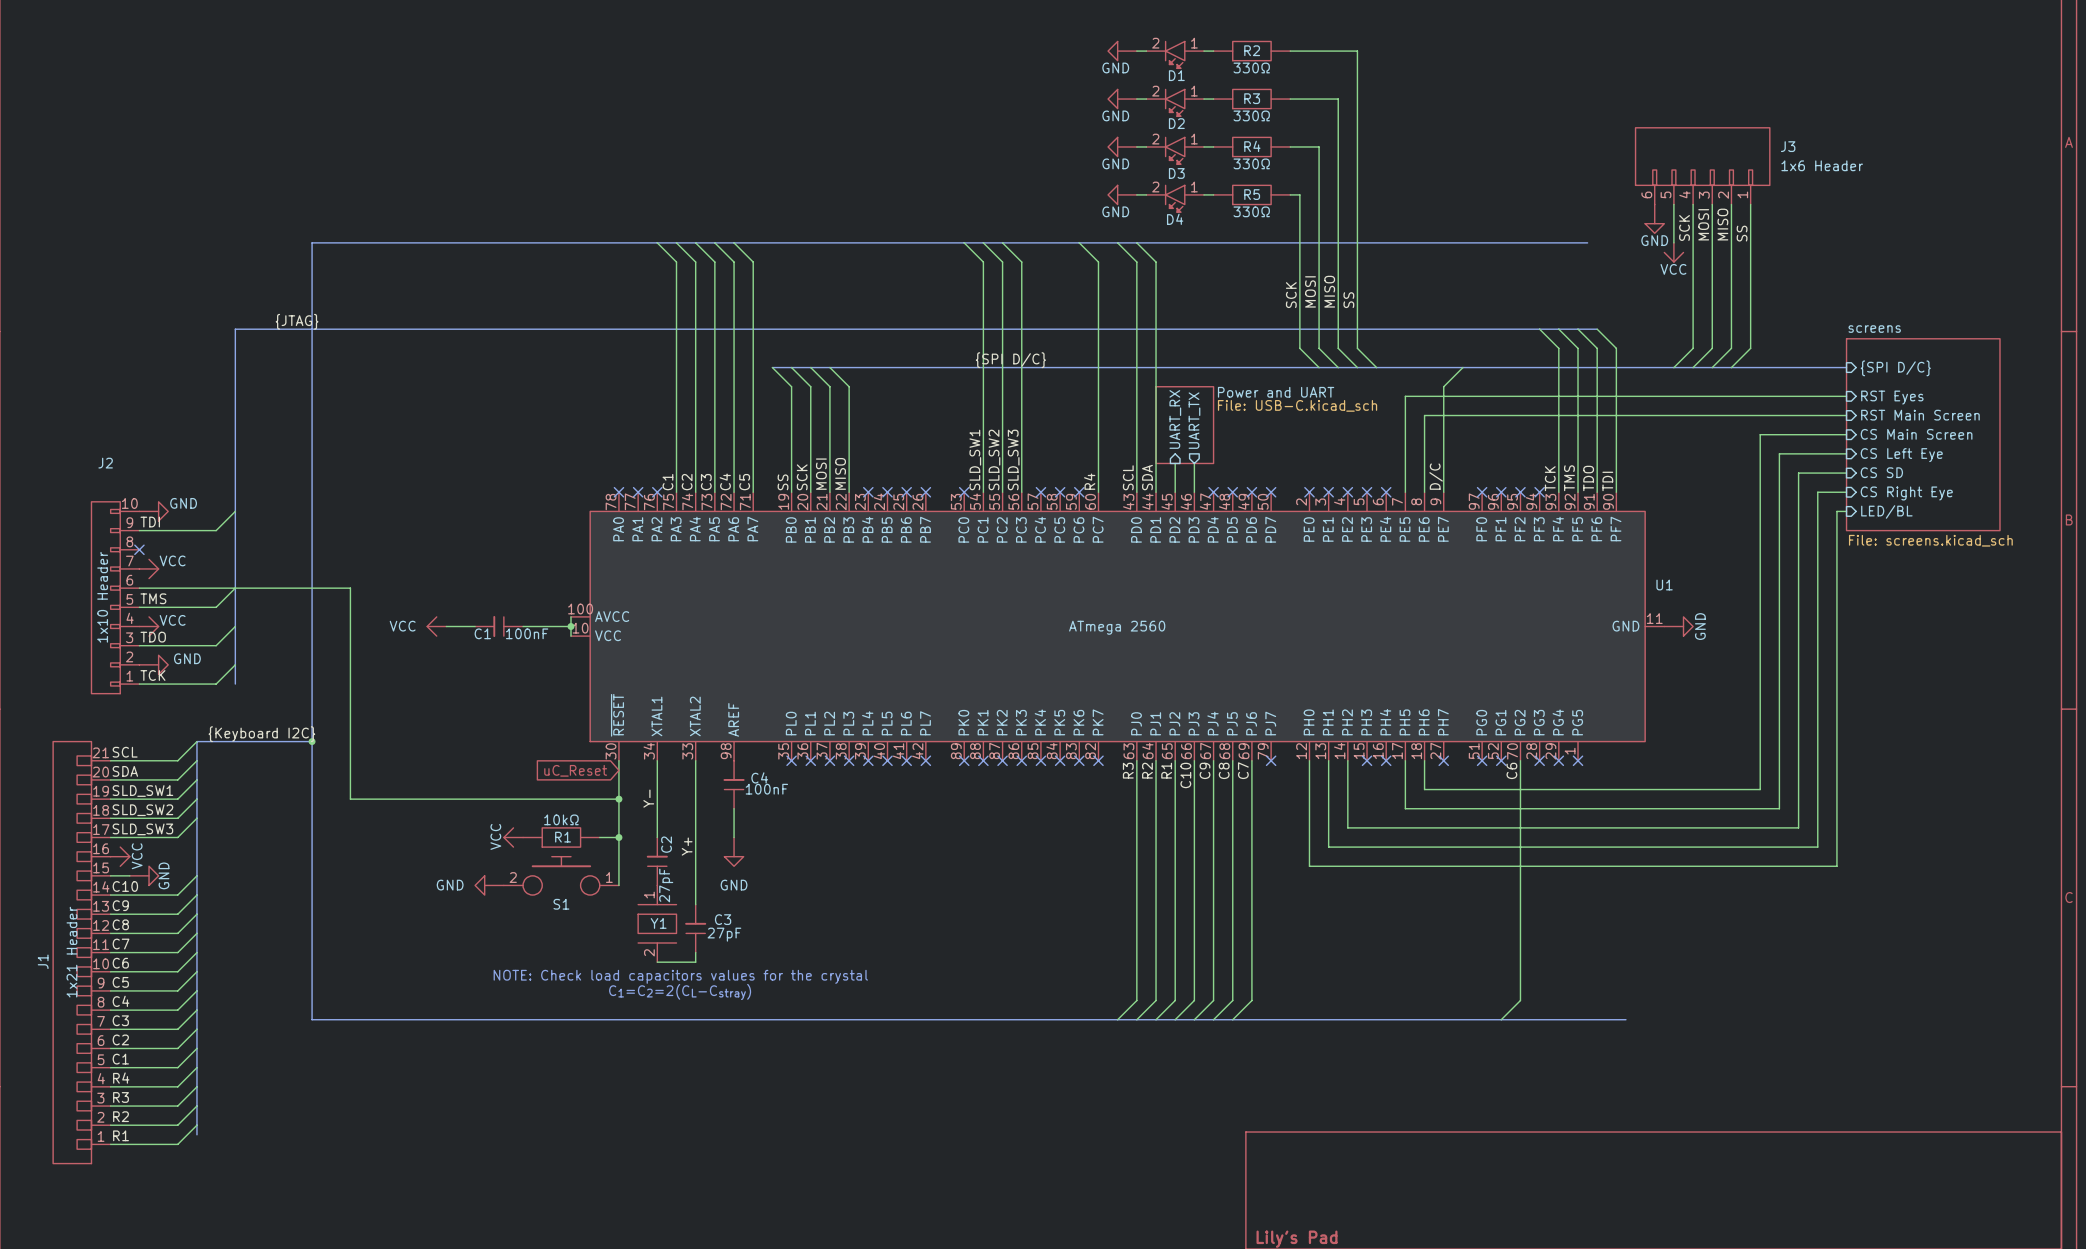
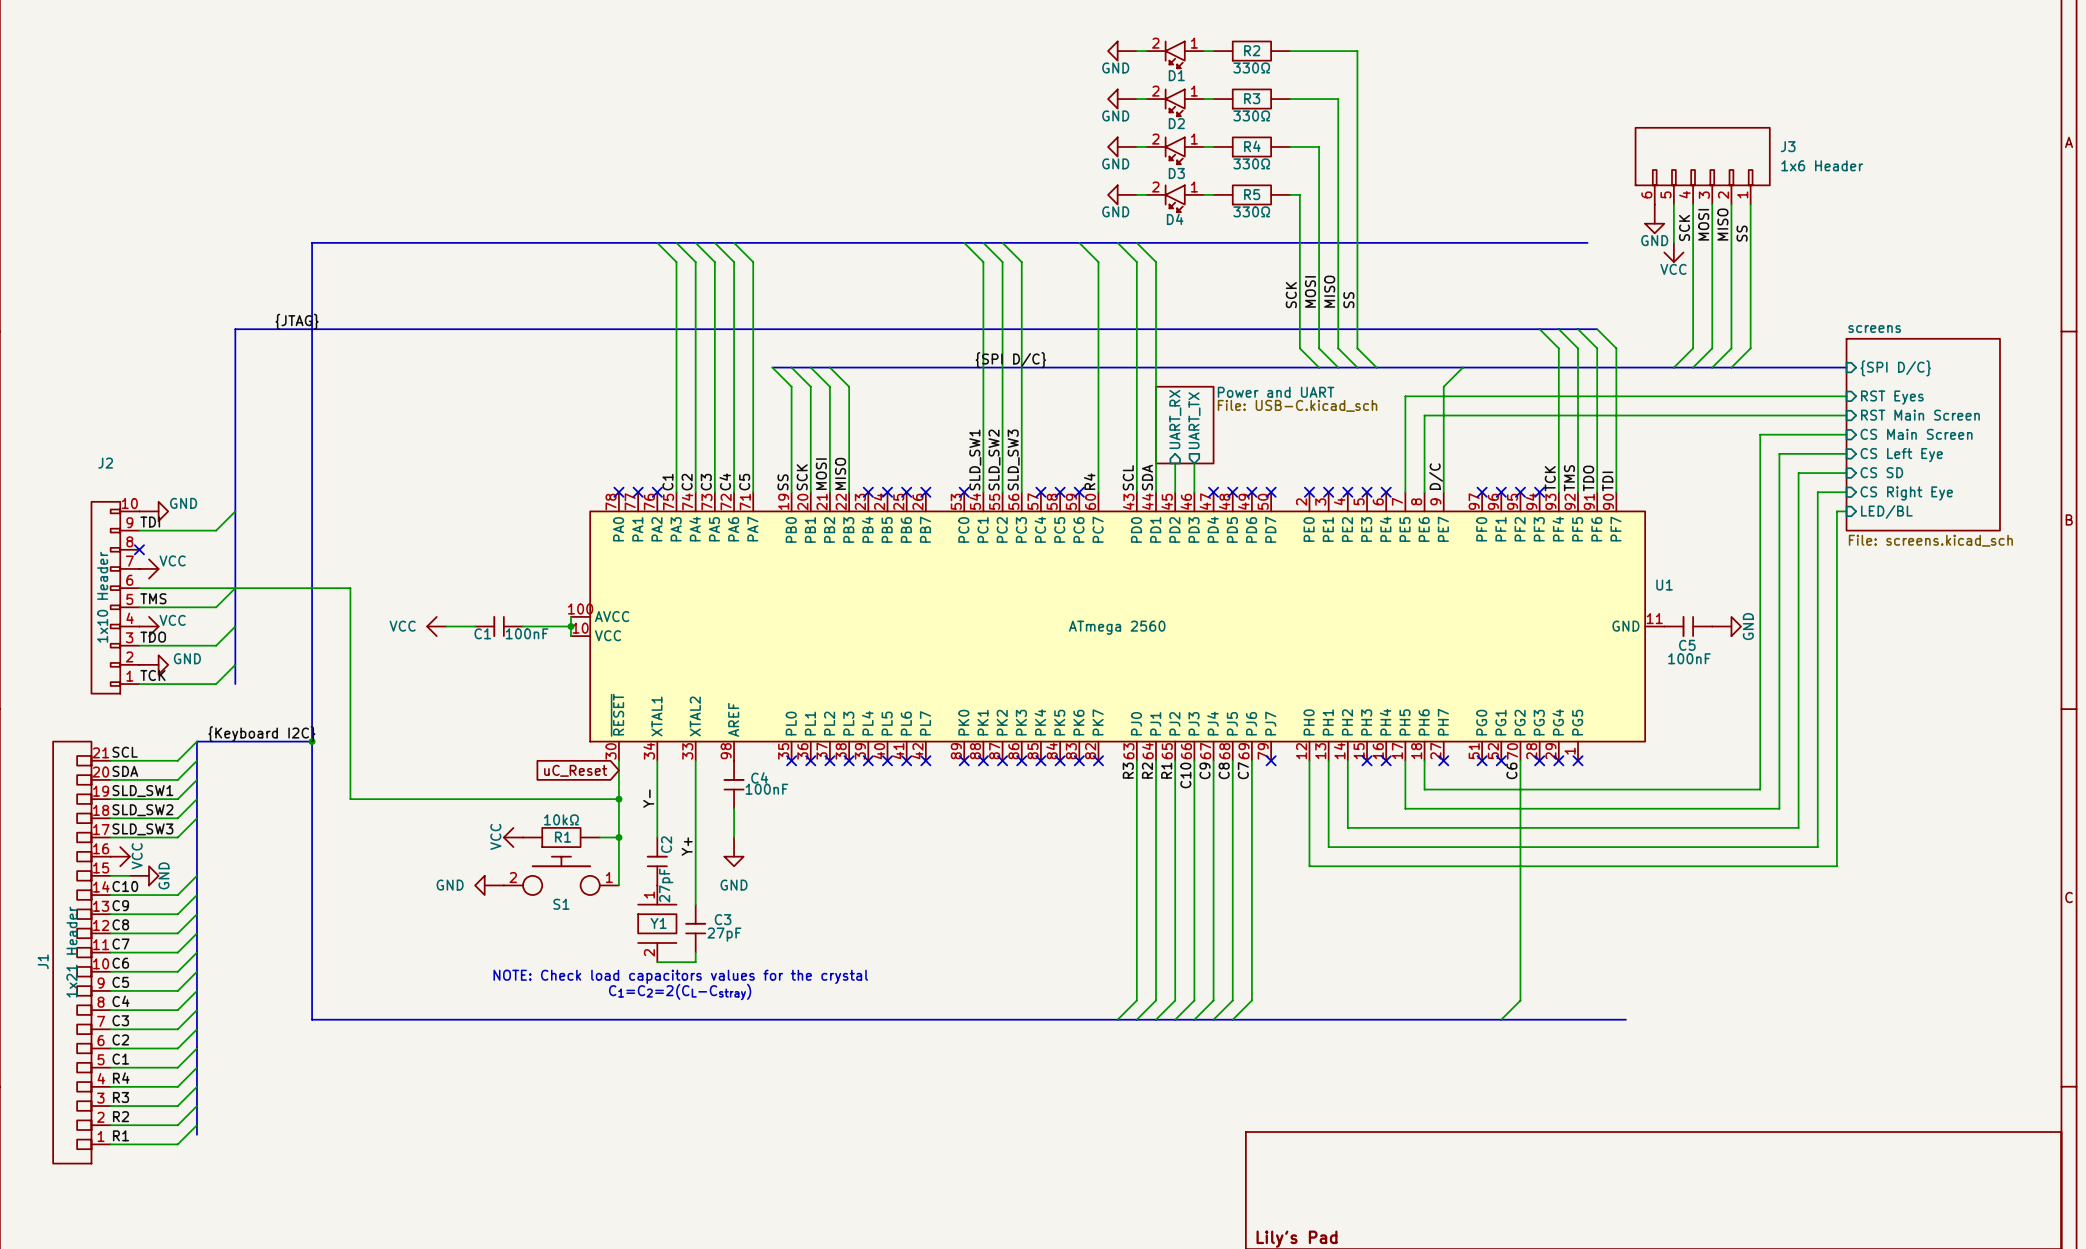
power symbol position: GND (1678, 626) -> GND (1726, 626)
C5: none -> 100nF (1688, 626)

